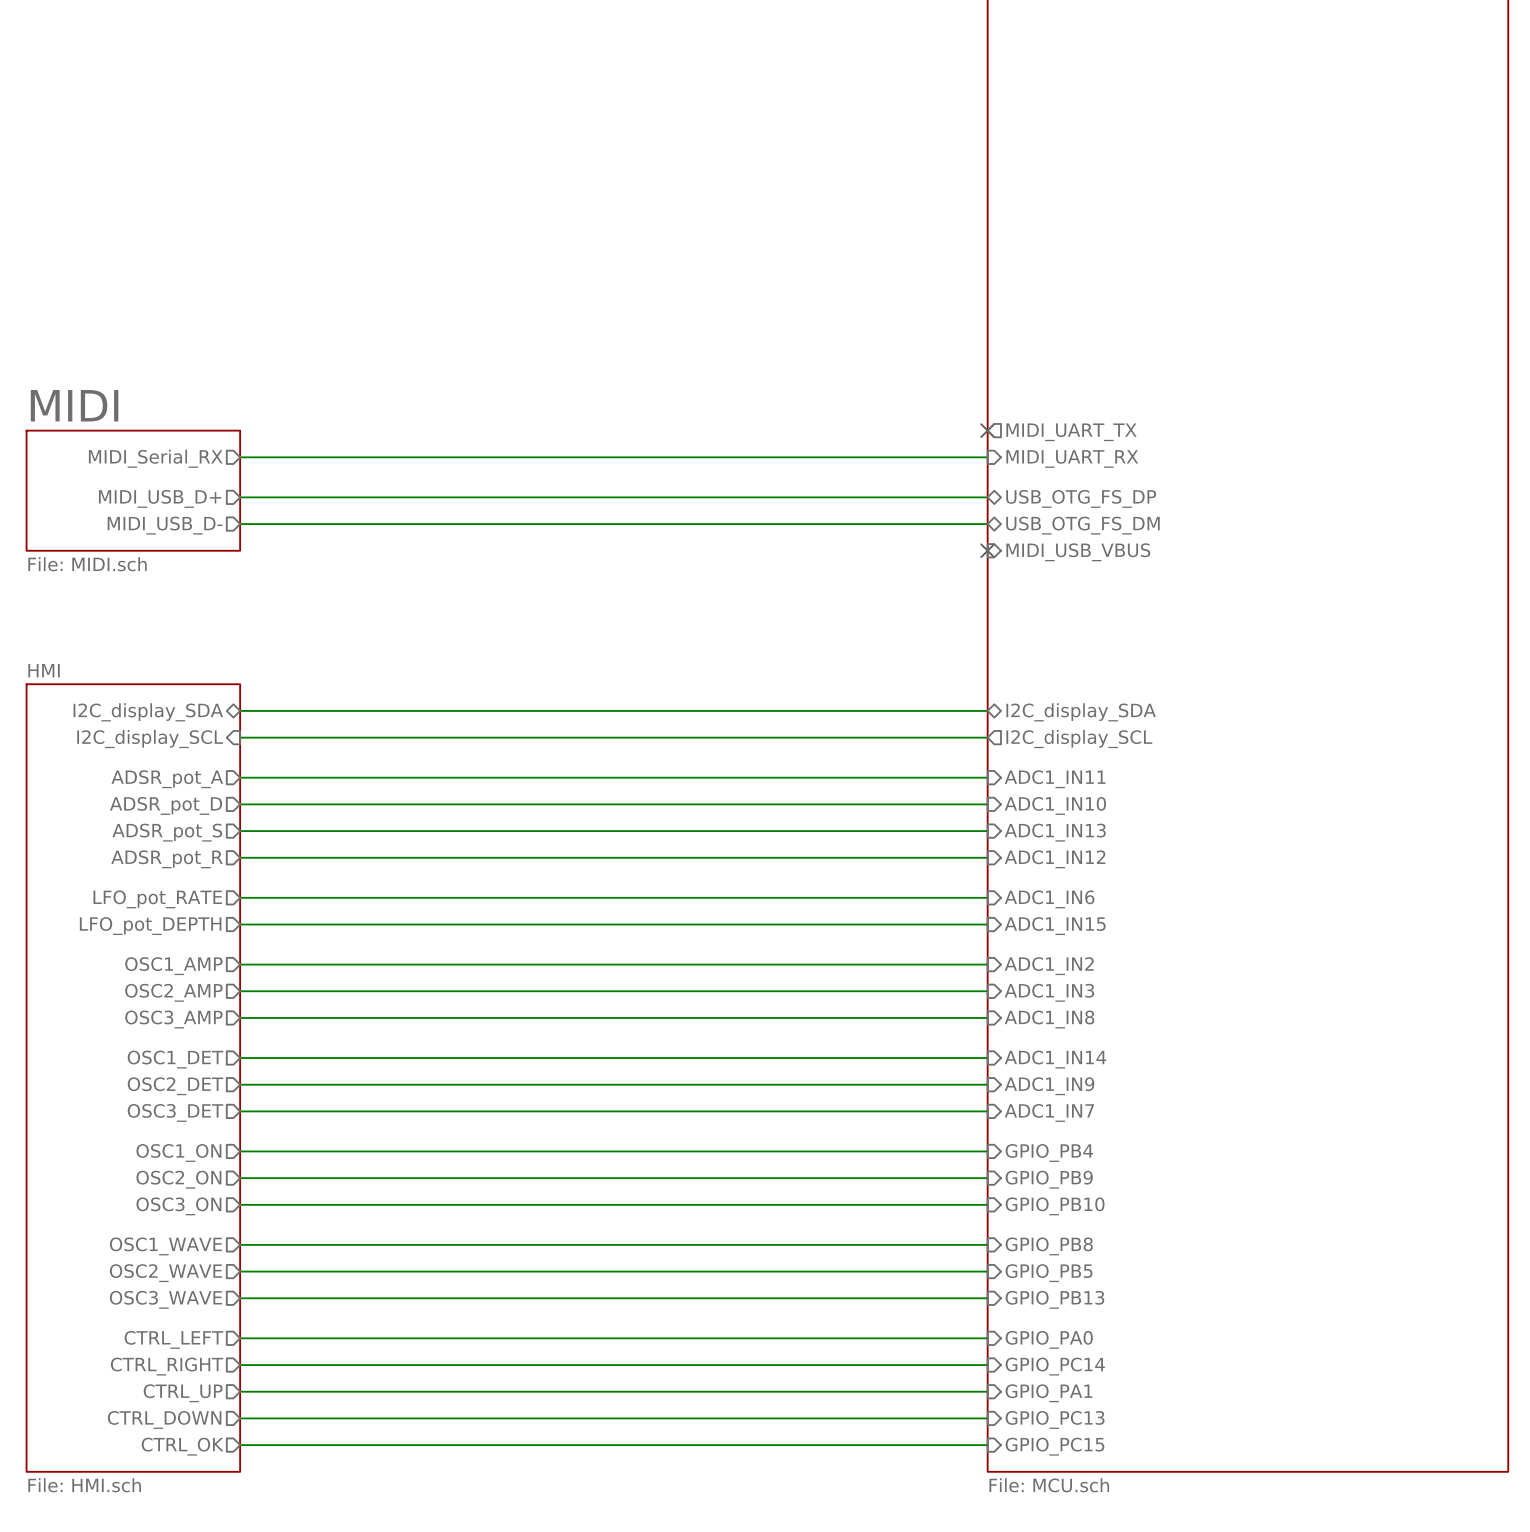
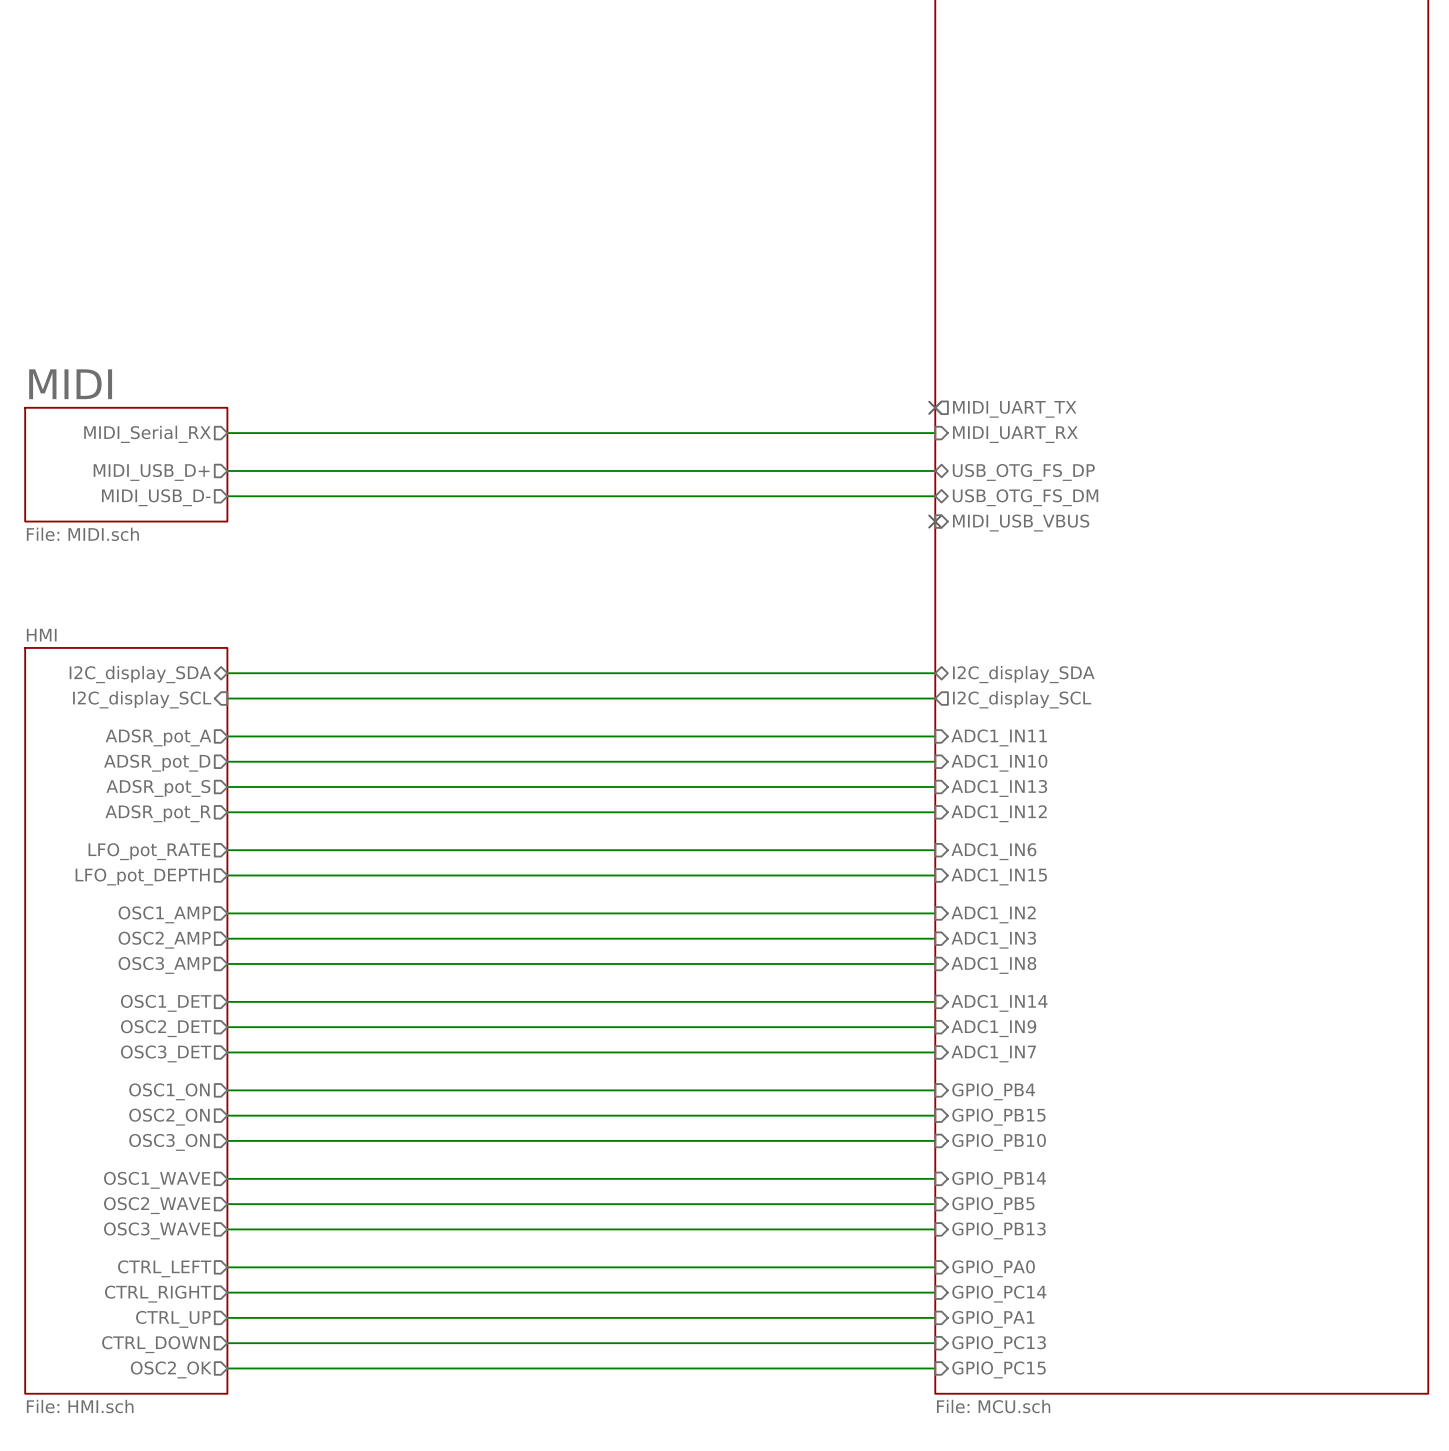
sheet pin: GPIO_PB9 (1049, 1179) -> GPIO_PB15 (998, 1117)
sheet pin: GPIO_PB8 (1049, 1246) -> GPIO_PB14 (999, 1180)
sheet pin: CTRL_OK (182, 1446) -> OSC2_OK (171, 1369)

